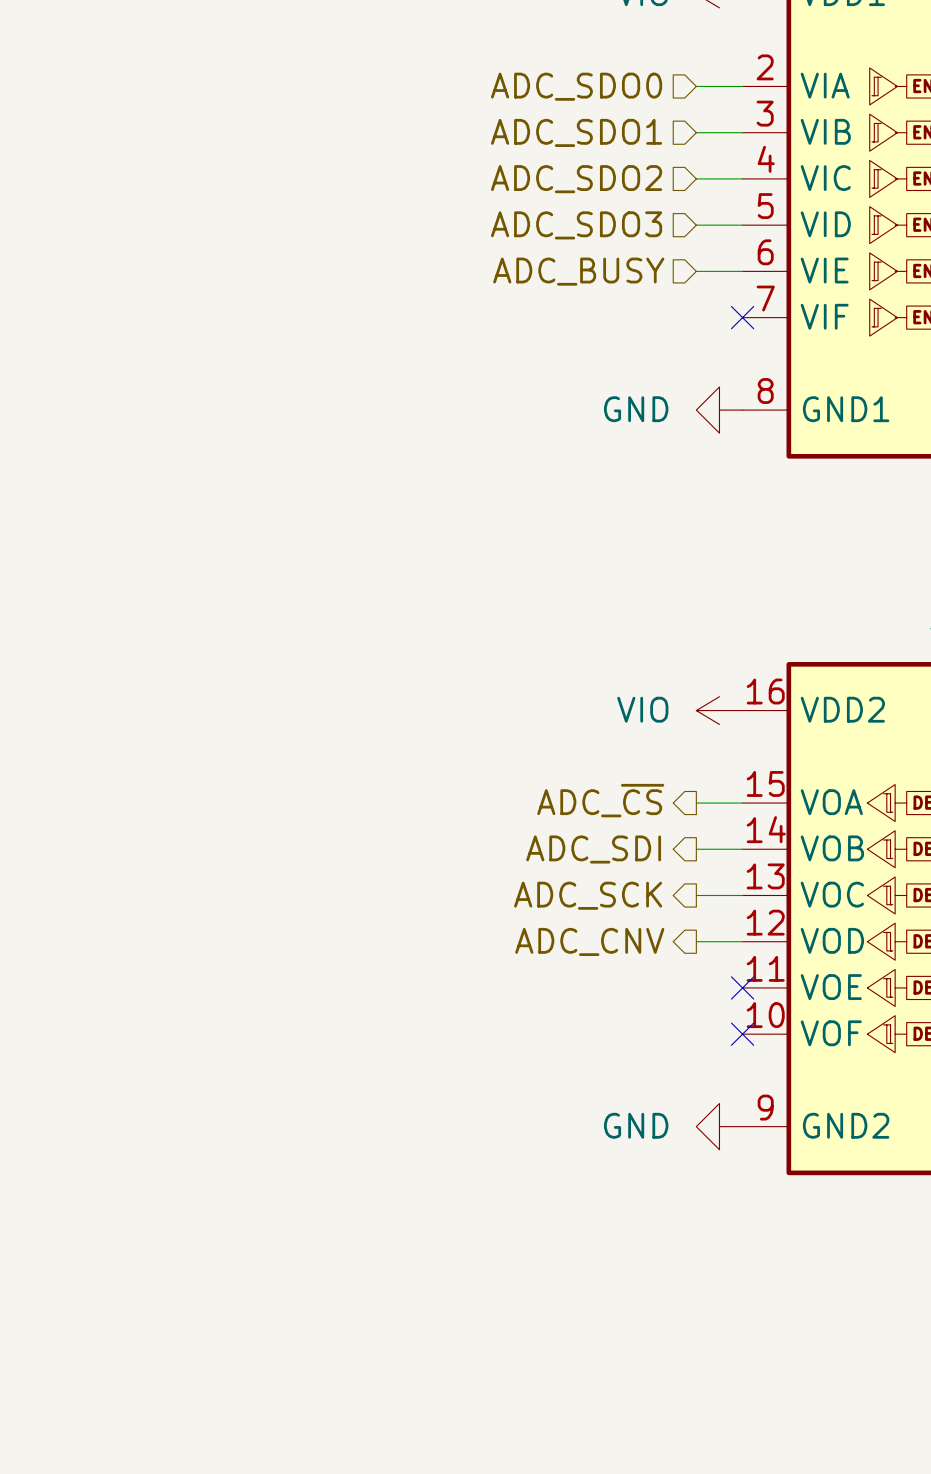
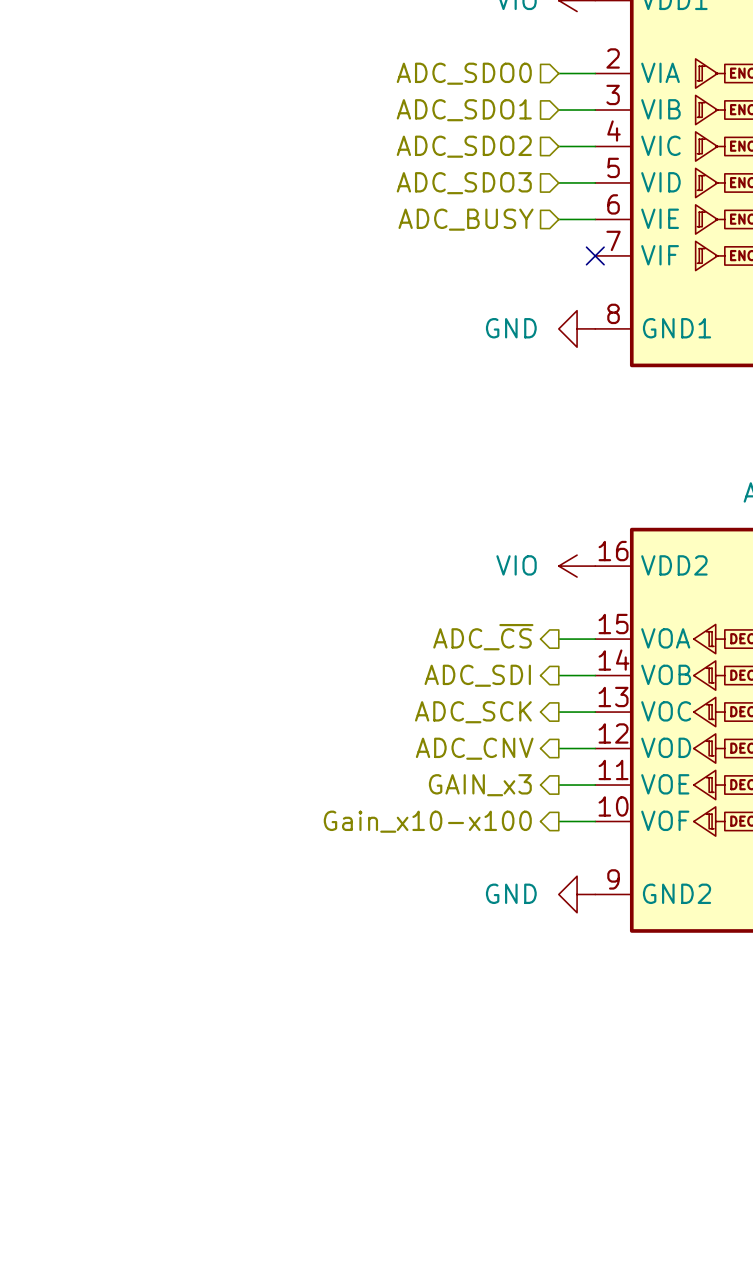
wire: none -> (558, 785) (595, 785)
no-connect mark: (742, 987) -> none
hierarchical label: none -> GAIN_x3 (480, 785)
hierarchical label: none -> Gain_x10-x100 (427, 821)
wire: none -> (558, 821) (595, 821)
no-connect mark: (742, 1034) -> none

